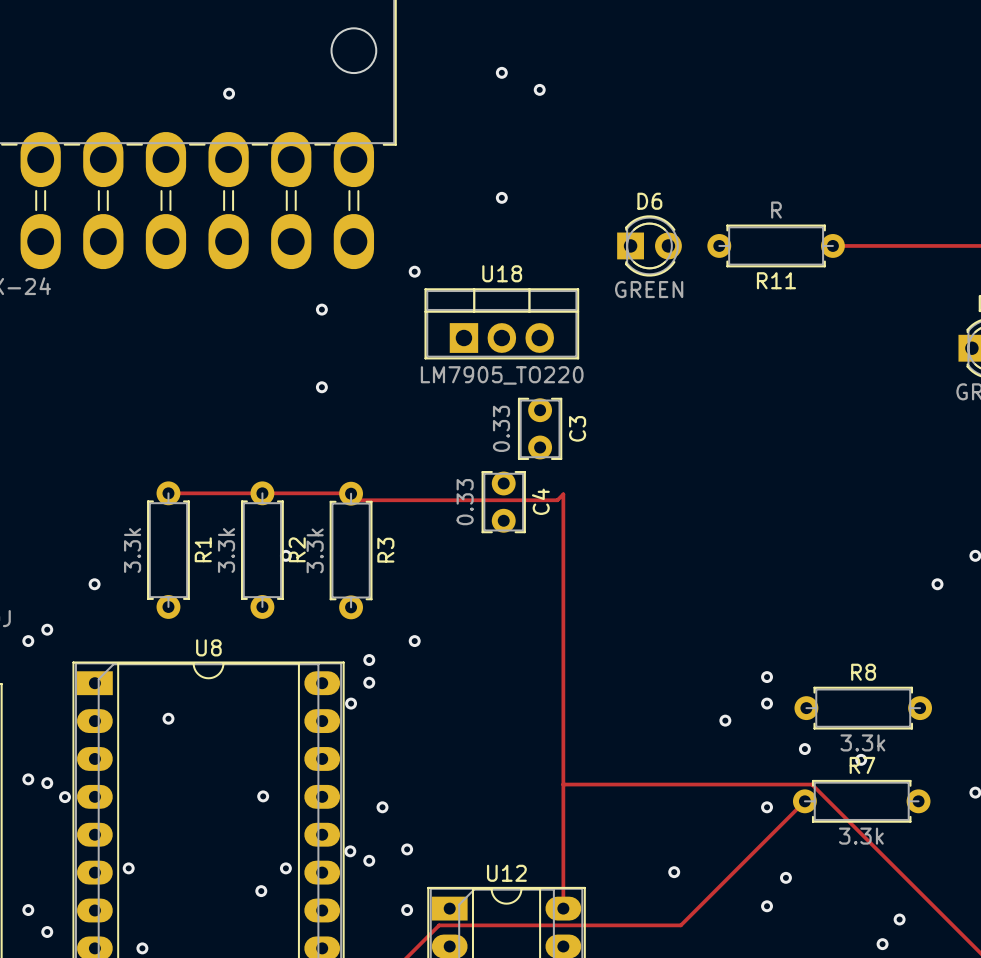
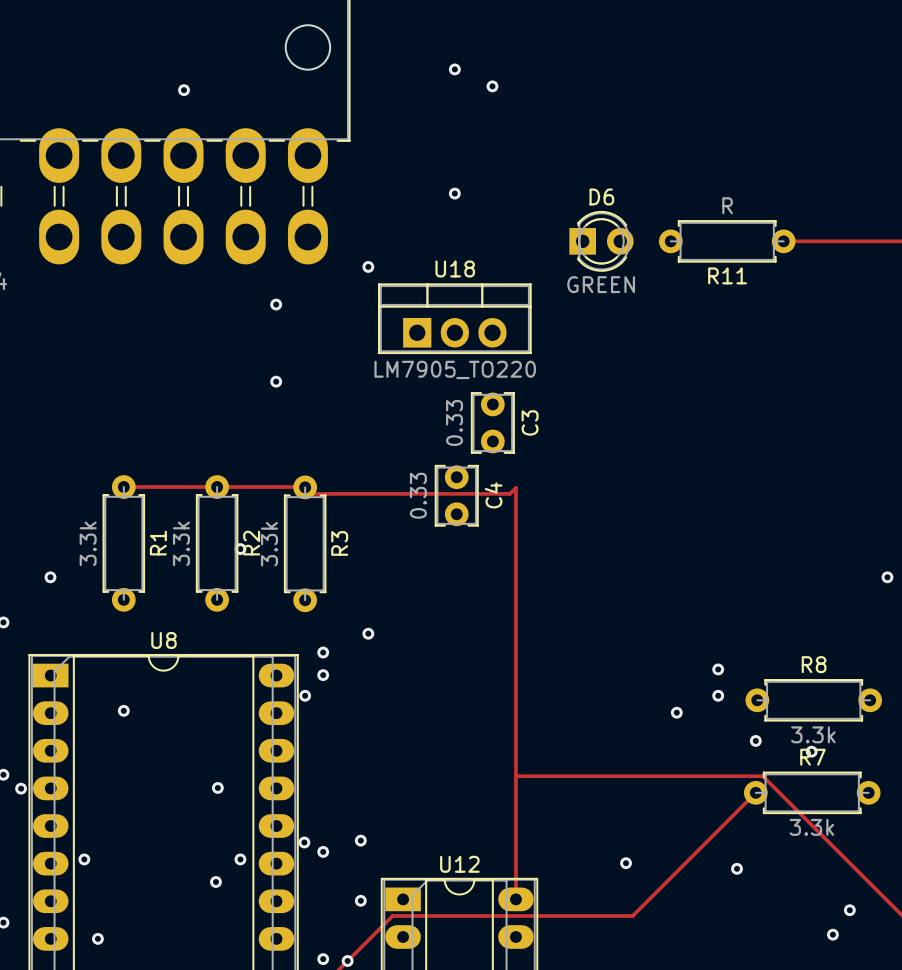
via: (382, 807) -> none
via: (767, 807) -> none
via: (767, 906) -> none

